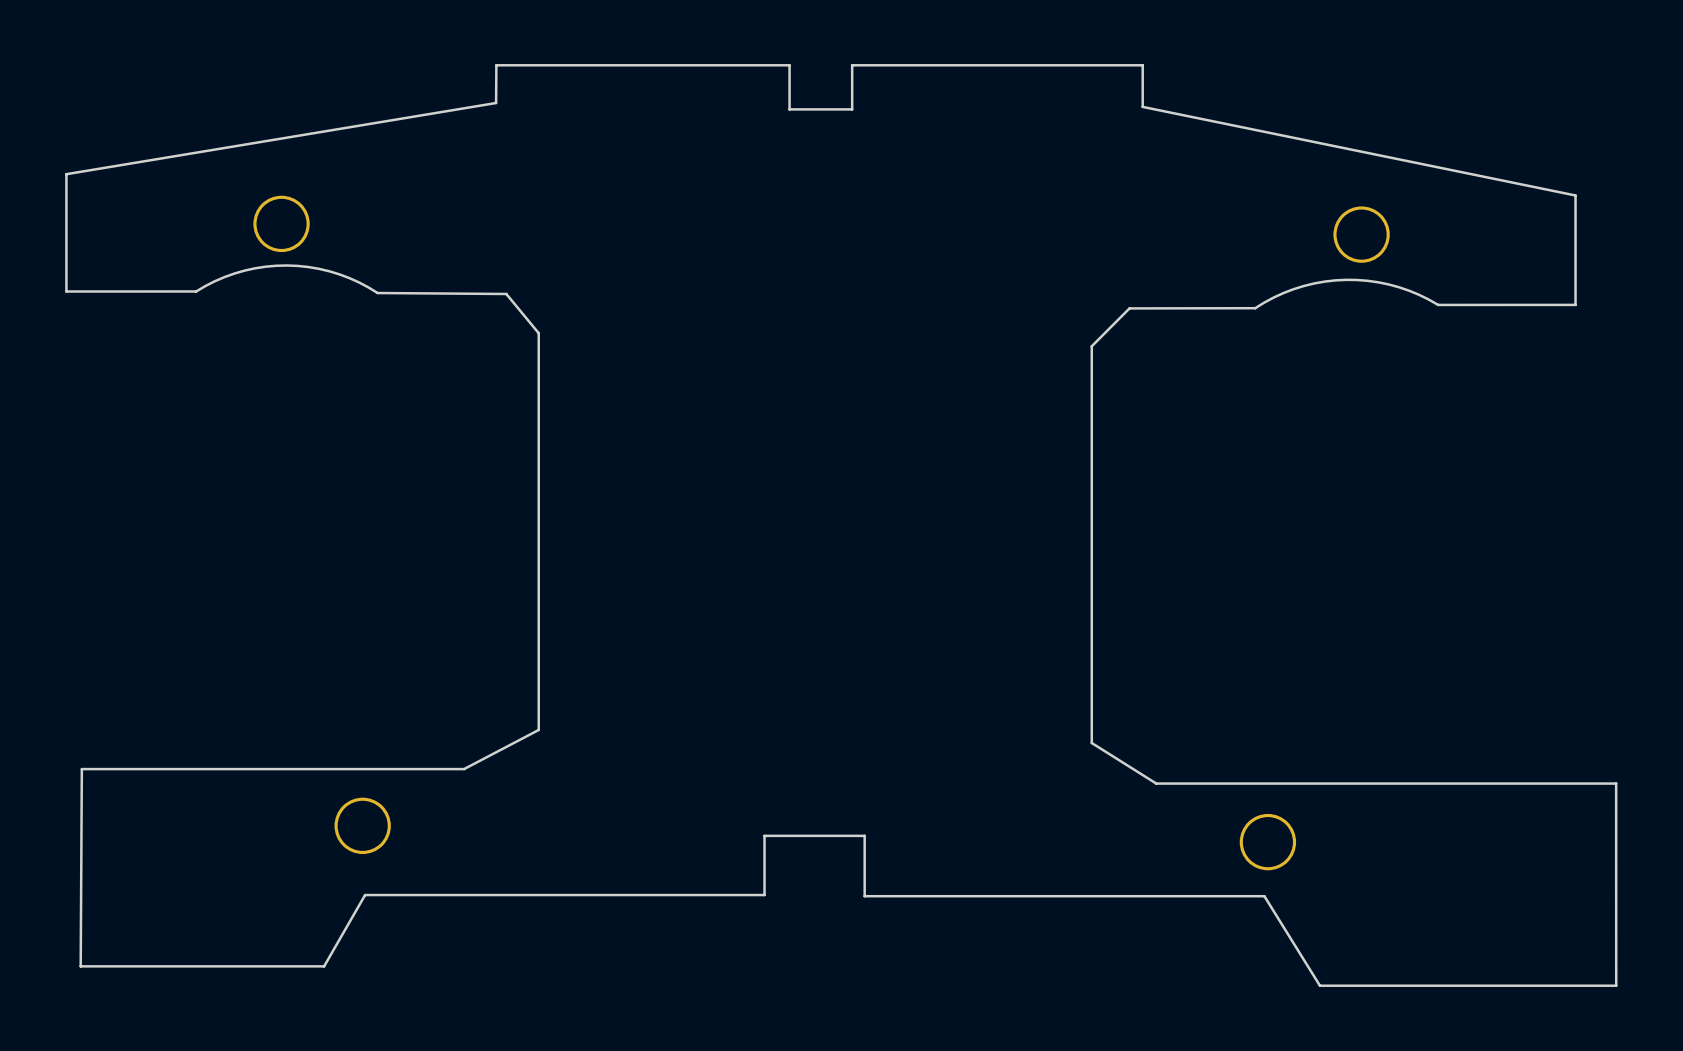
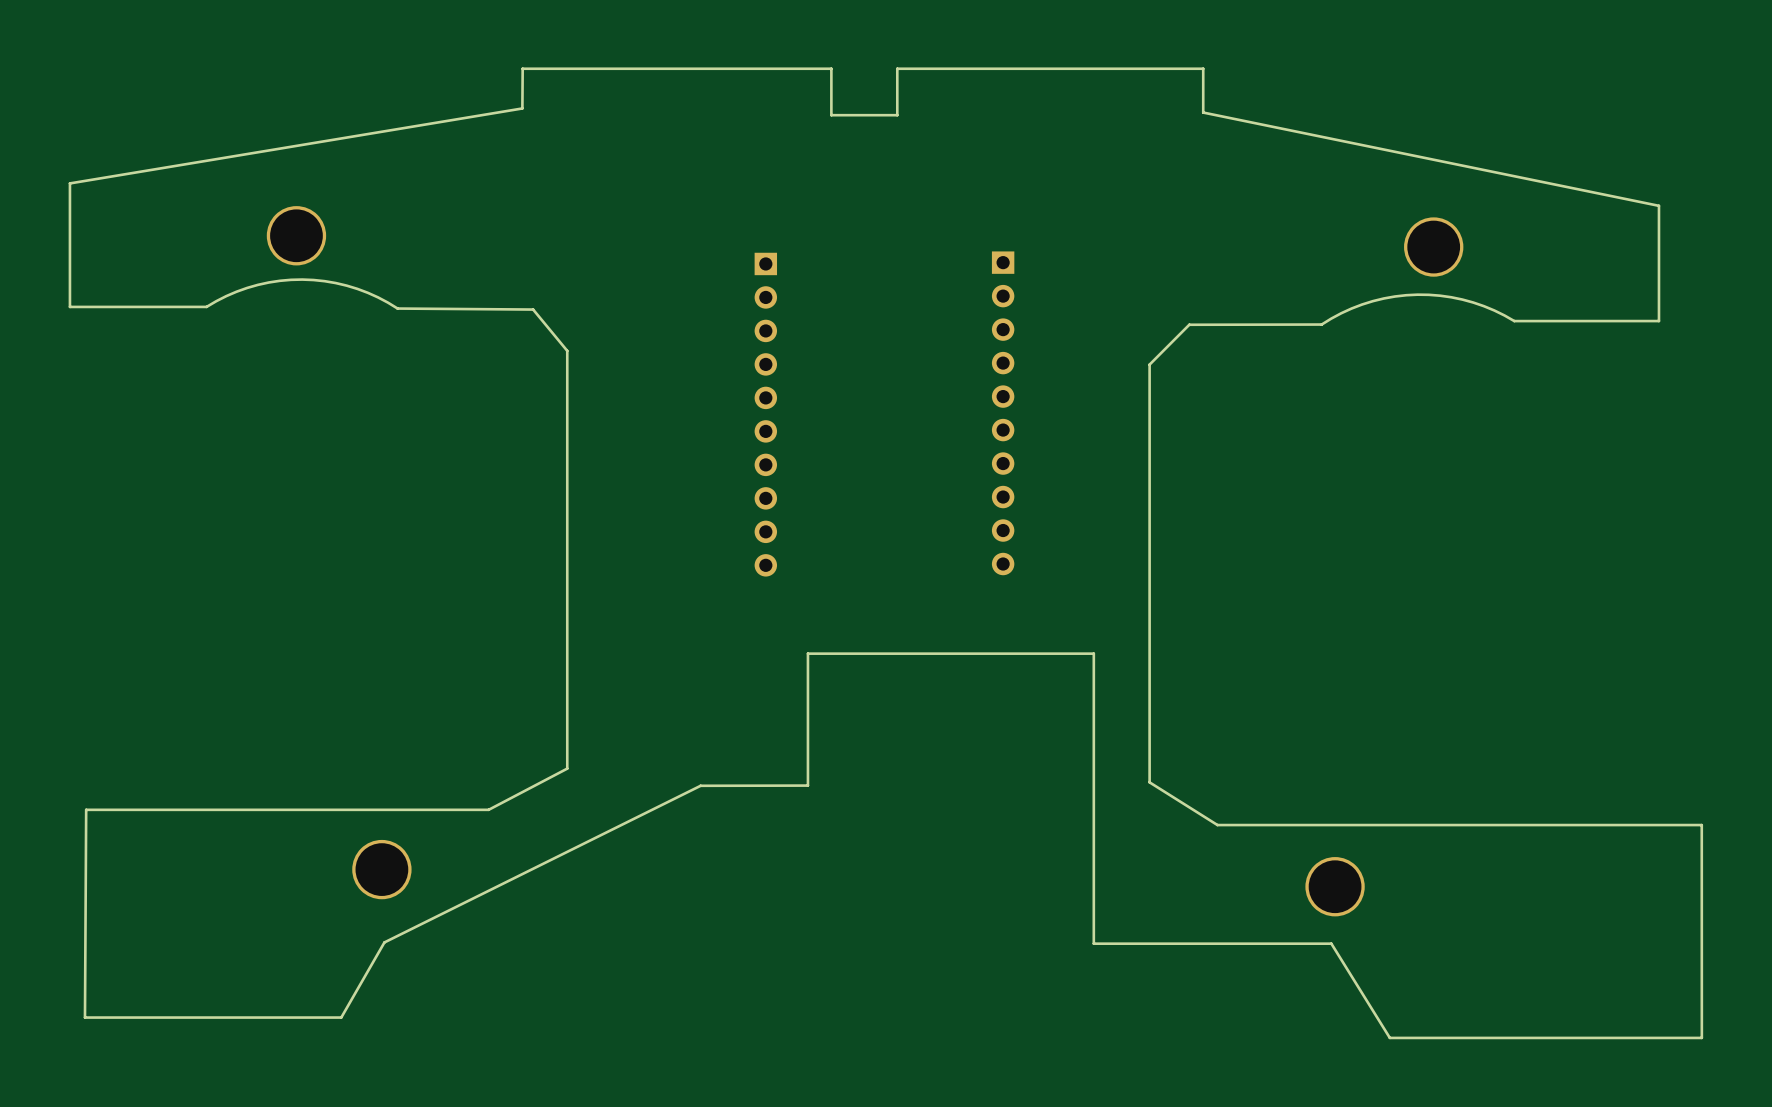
part: none -> (1003, 413)
part: none -> (765, 414)
board edge: (365, 895) (764, 895) (764, 835) (864, 835) (864, 896) (1038, 896) -> (384, 942) (700, 785) (807, 785) (807, 653) (1093, 653) (1093, 943)

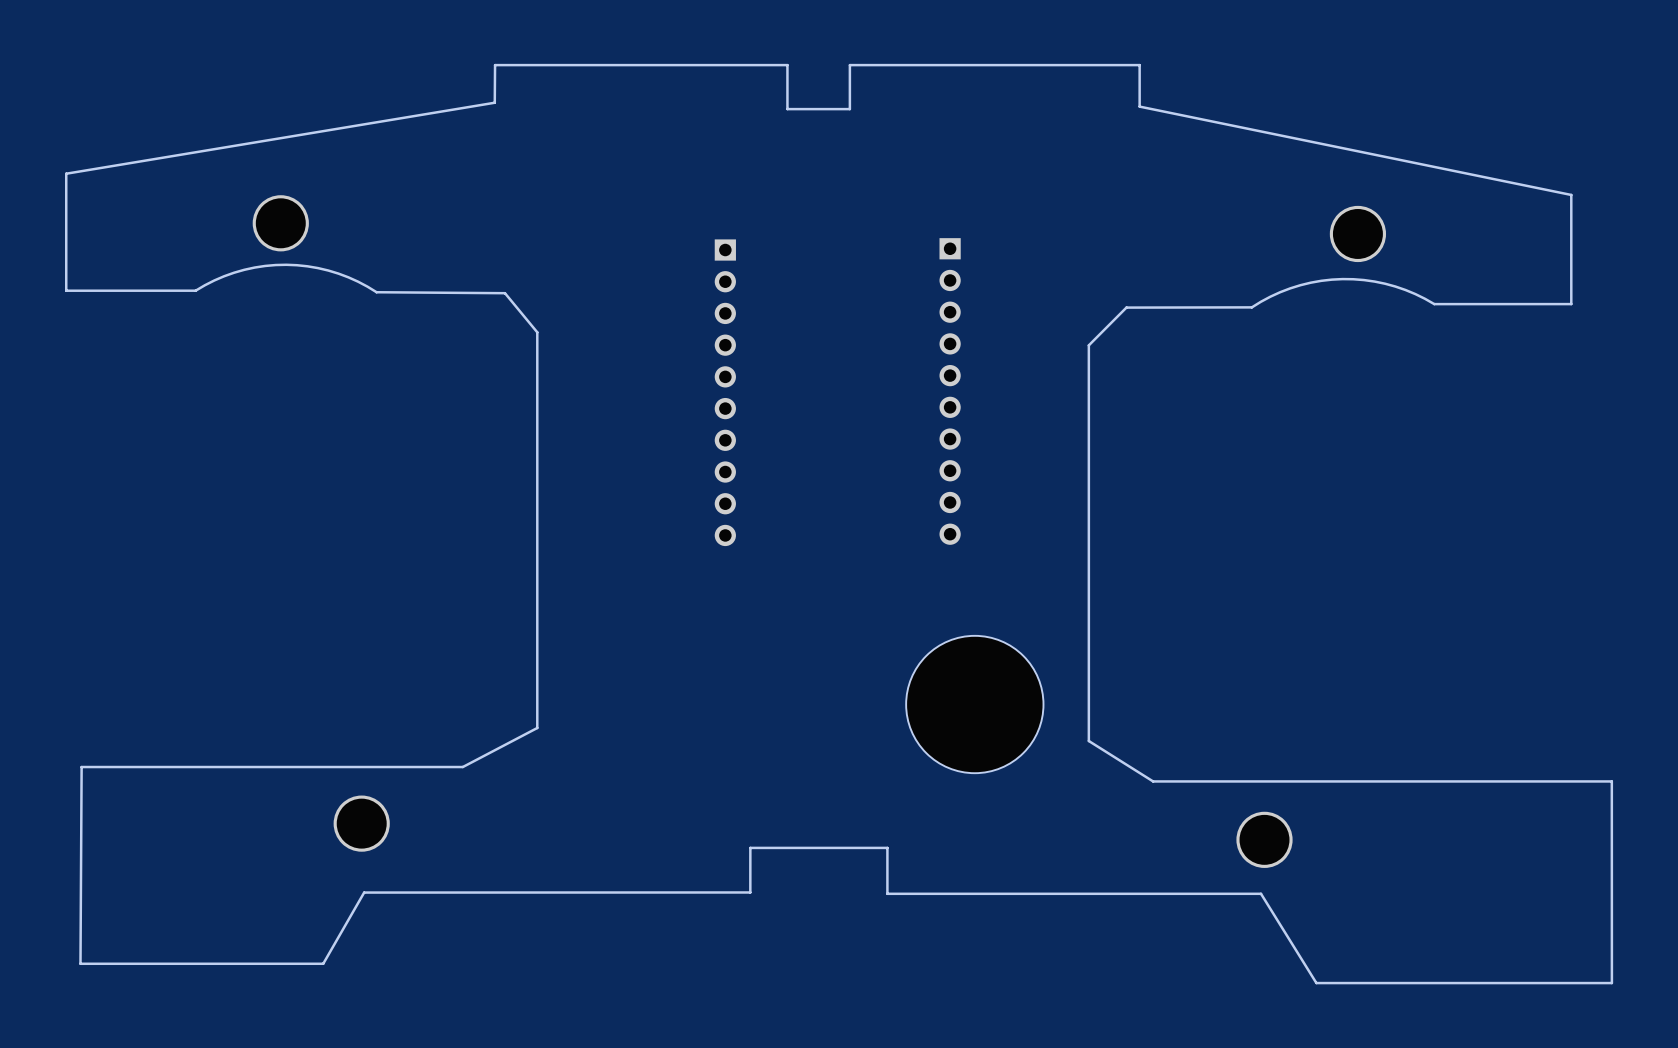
part: none -> (974, 704)
board edge: (384, 942) (700, 785) (807, 785) (807, 653) (1093, 653) (1093, 943) -> (364, 892) (750, 892) (750, 847) (887, 847) (887, 893) (1036, 893)

